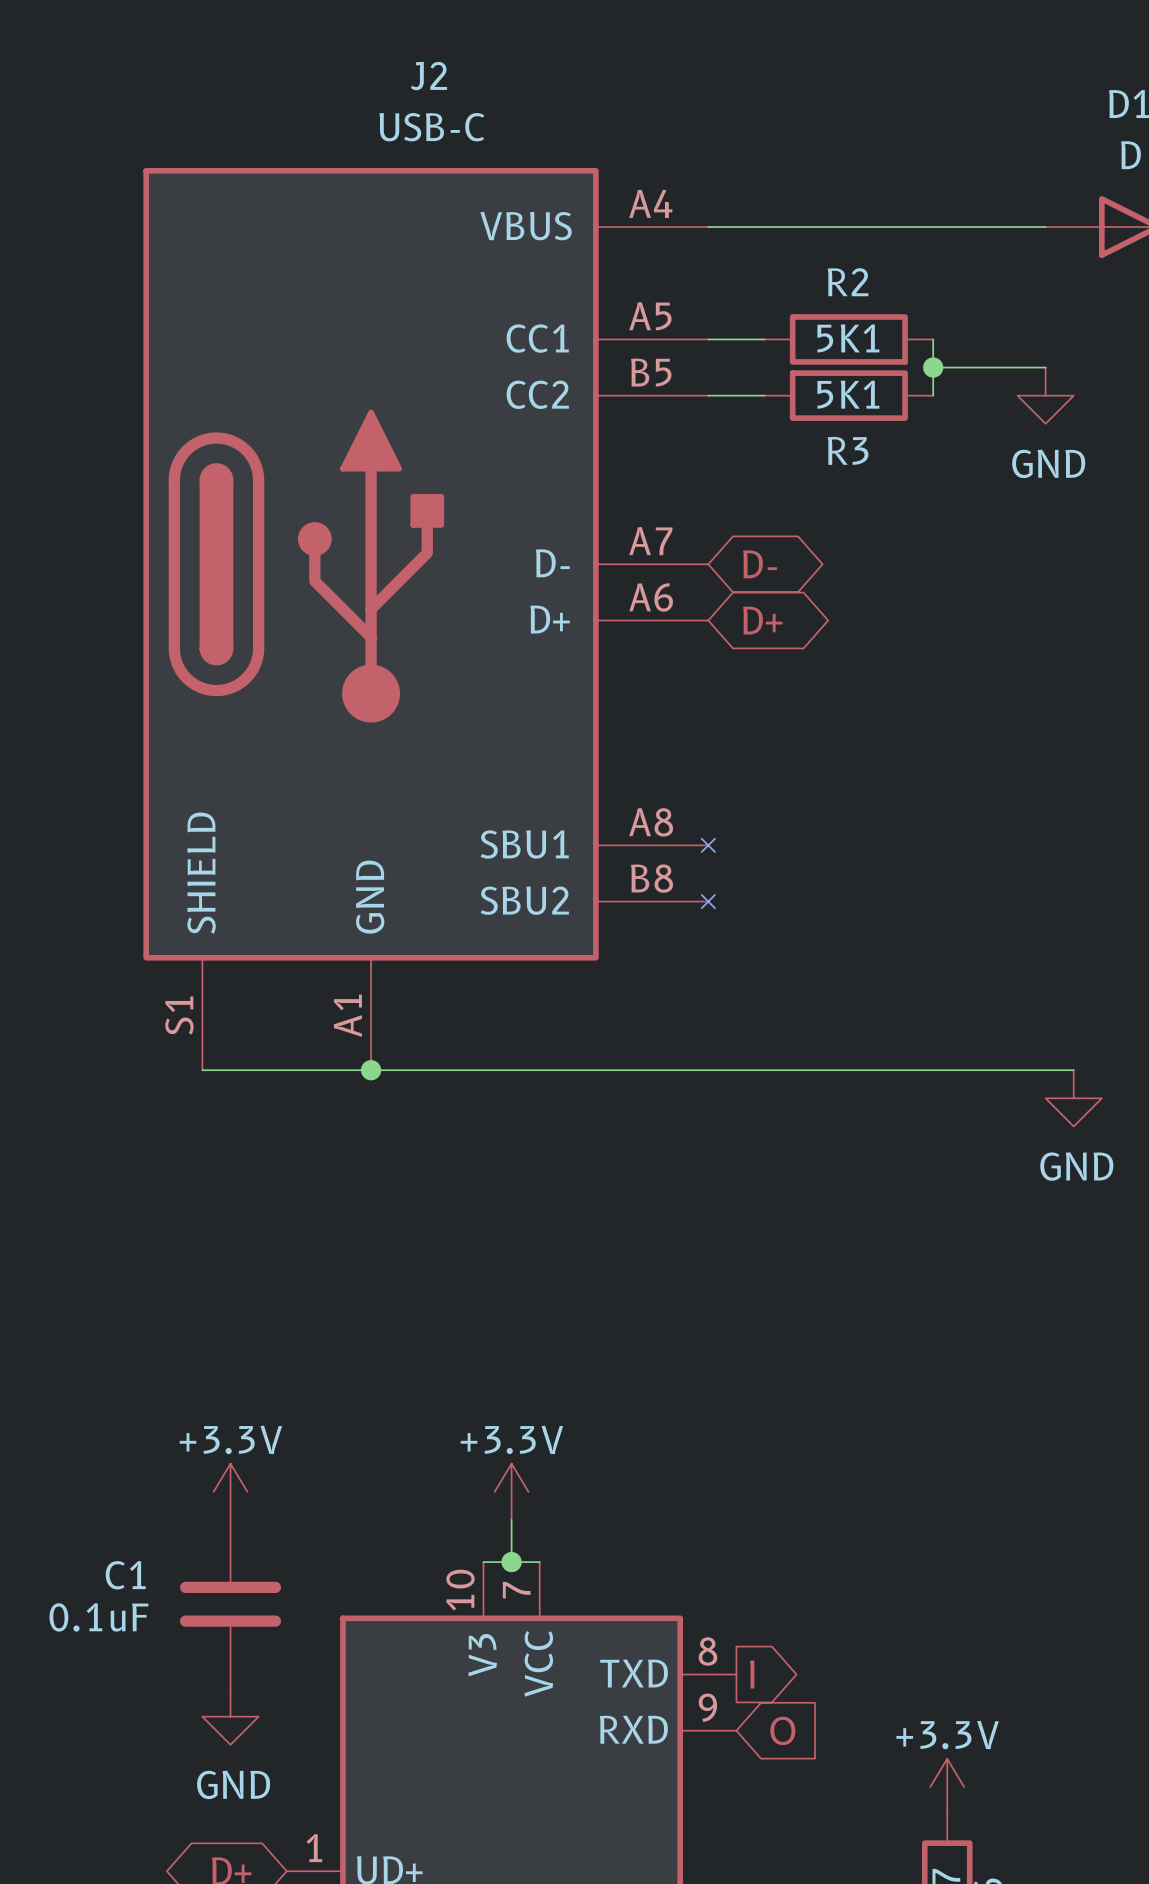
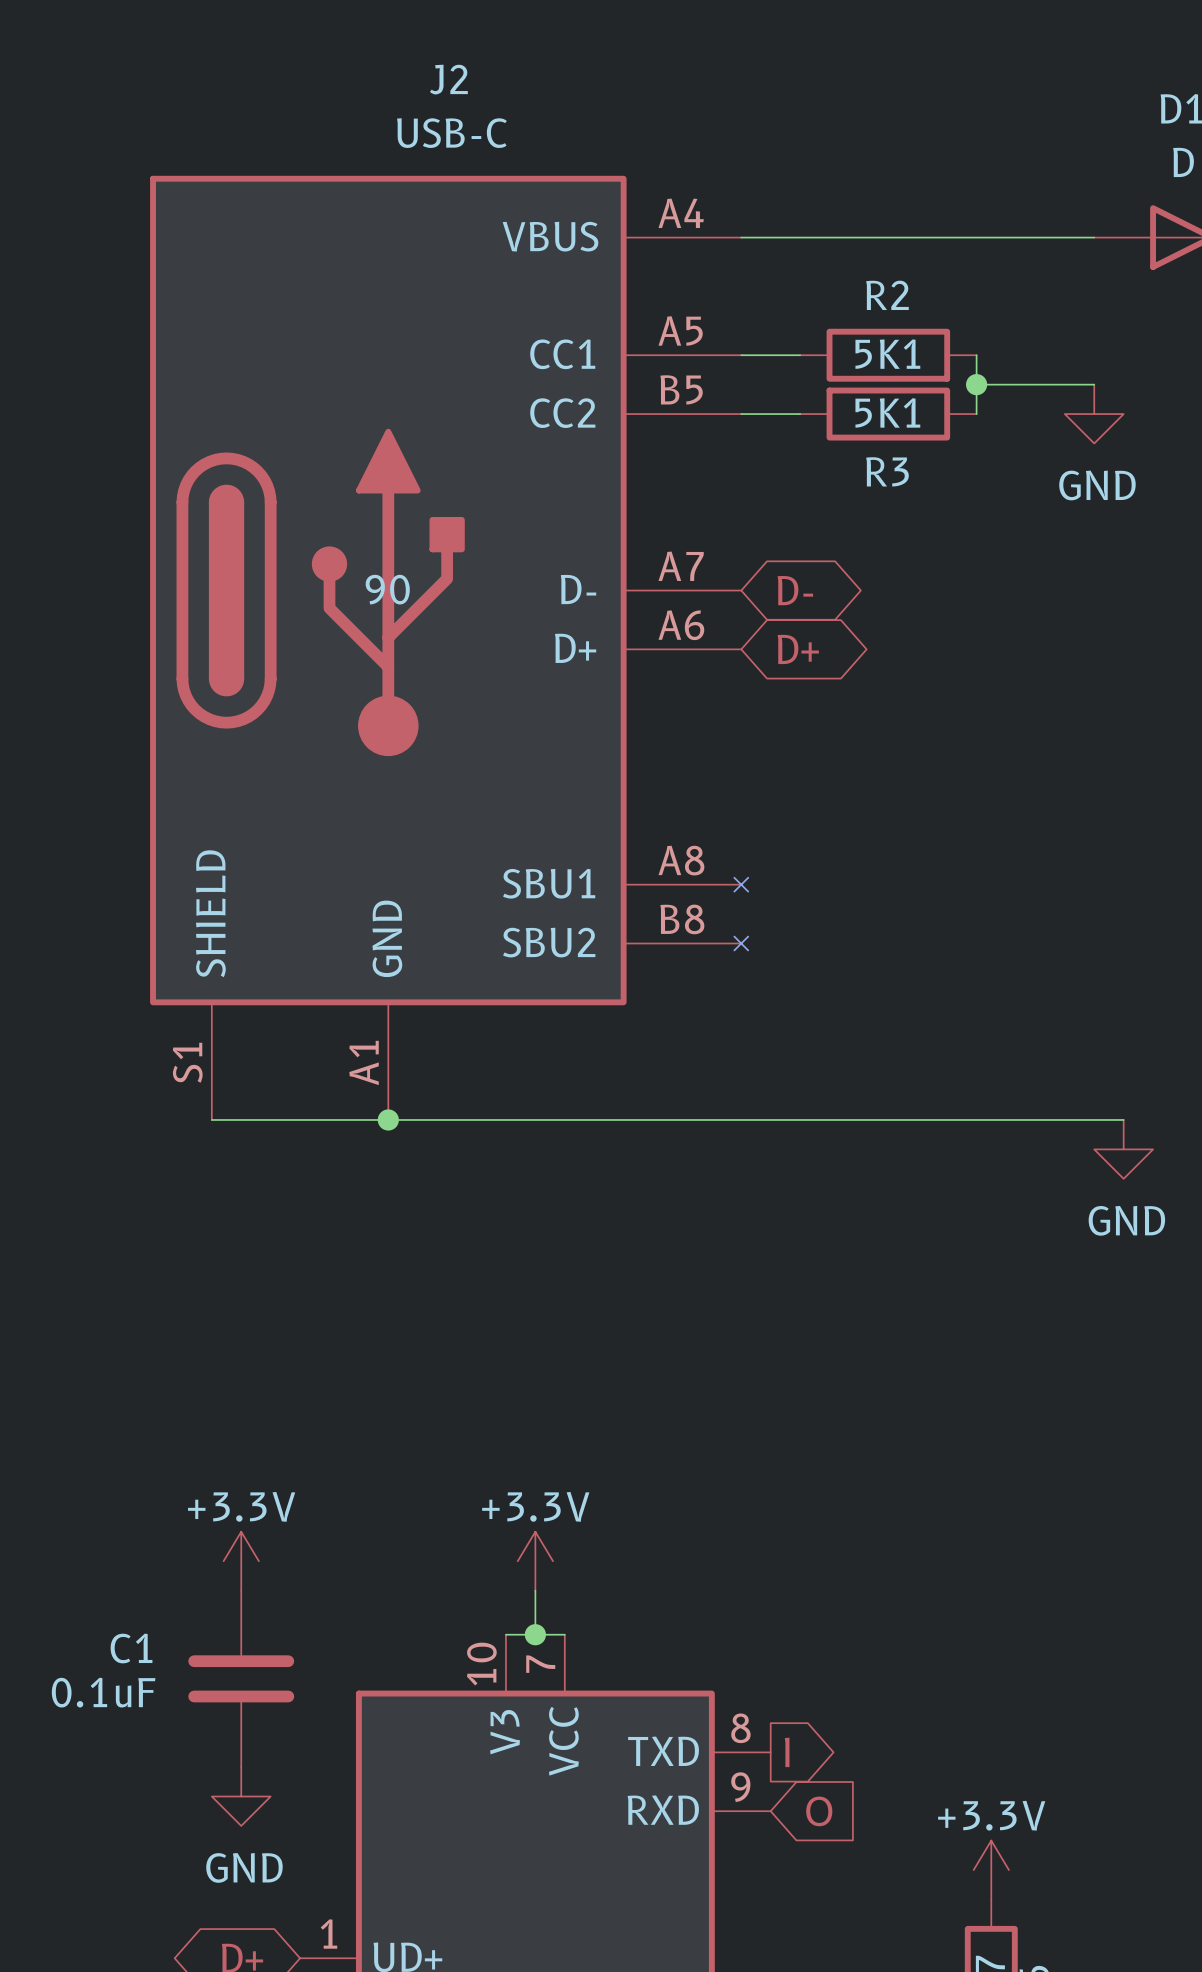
J2 text: none -> 90 (387, 589)

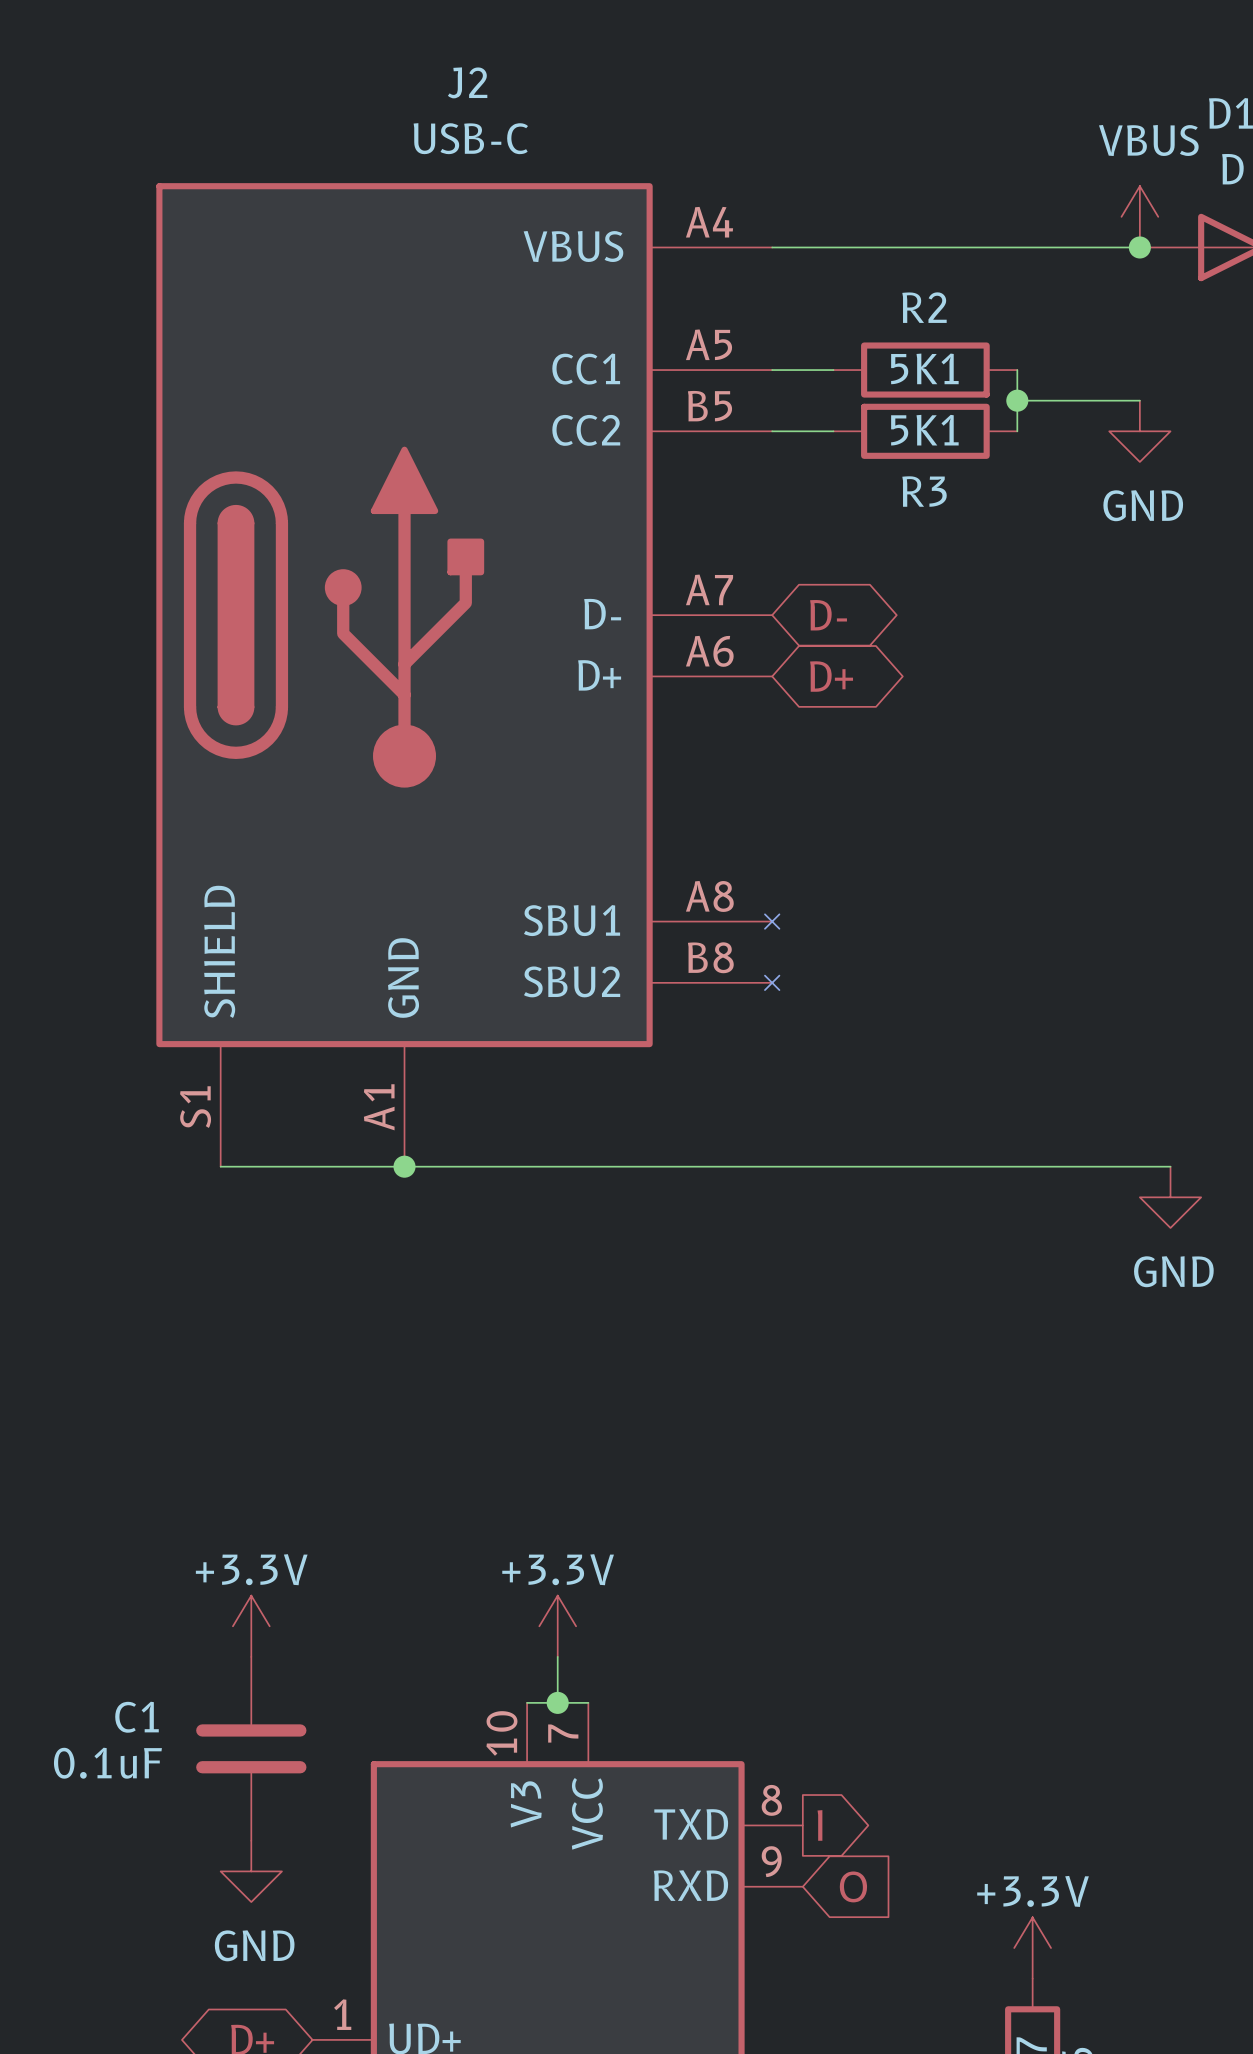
power symbol: none -> VBUS (1139, 216)
junction: none -> (1139, 247)
J2 text: 90 (387, 589) -> none

